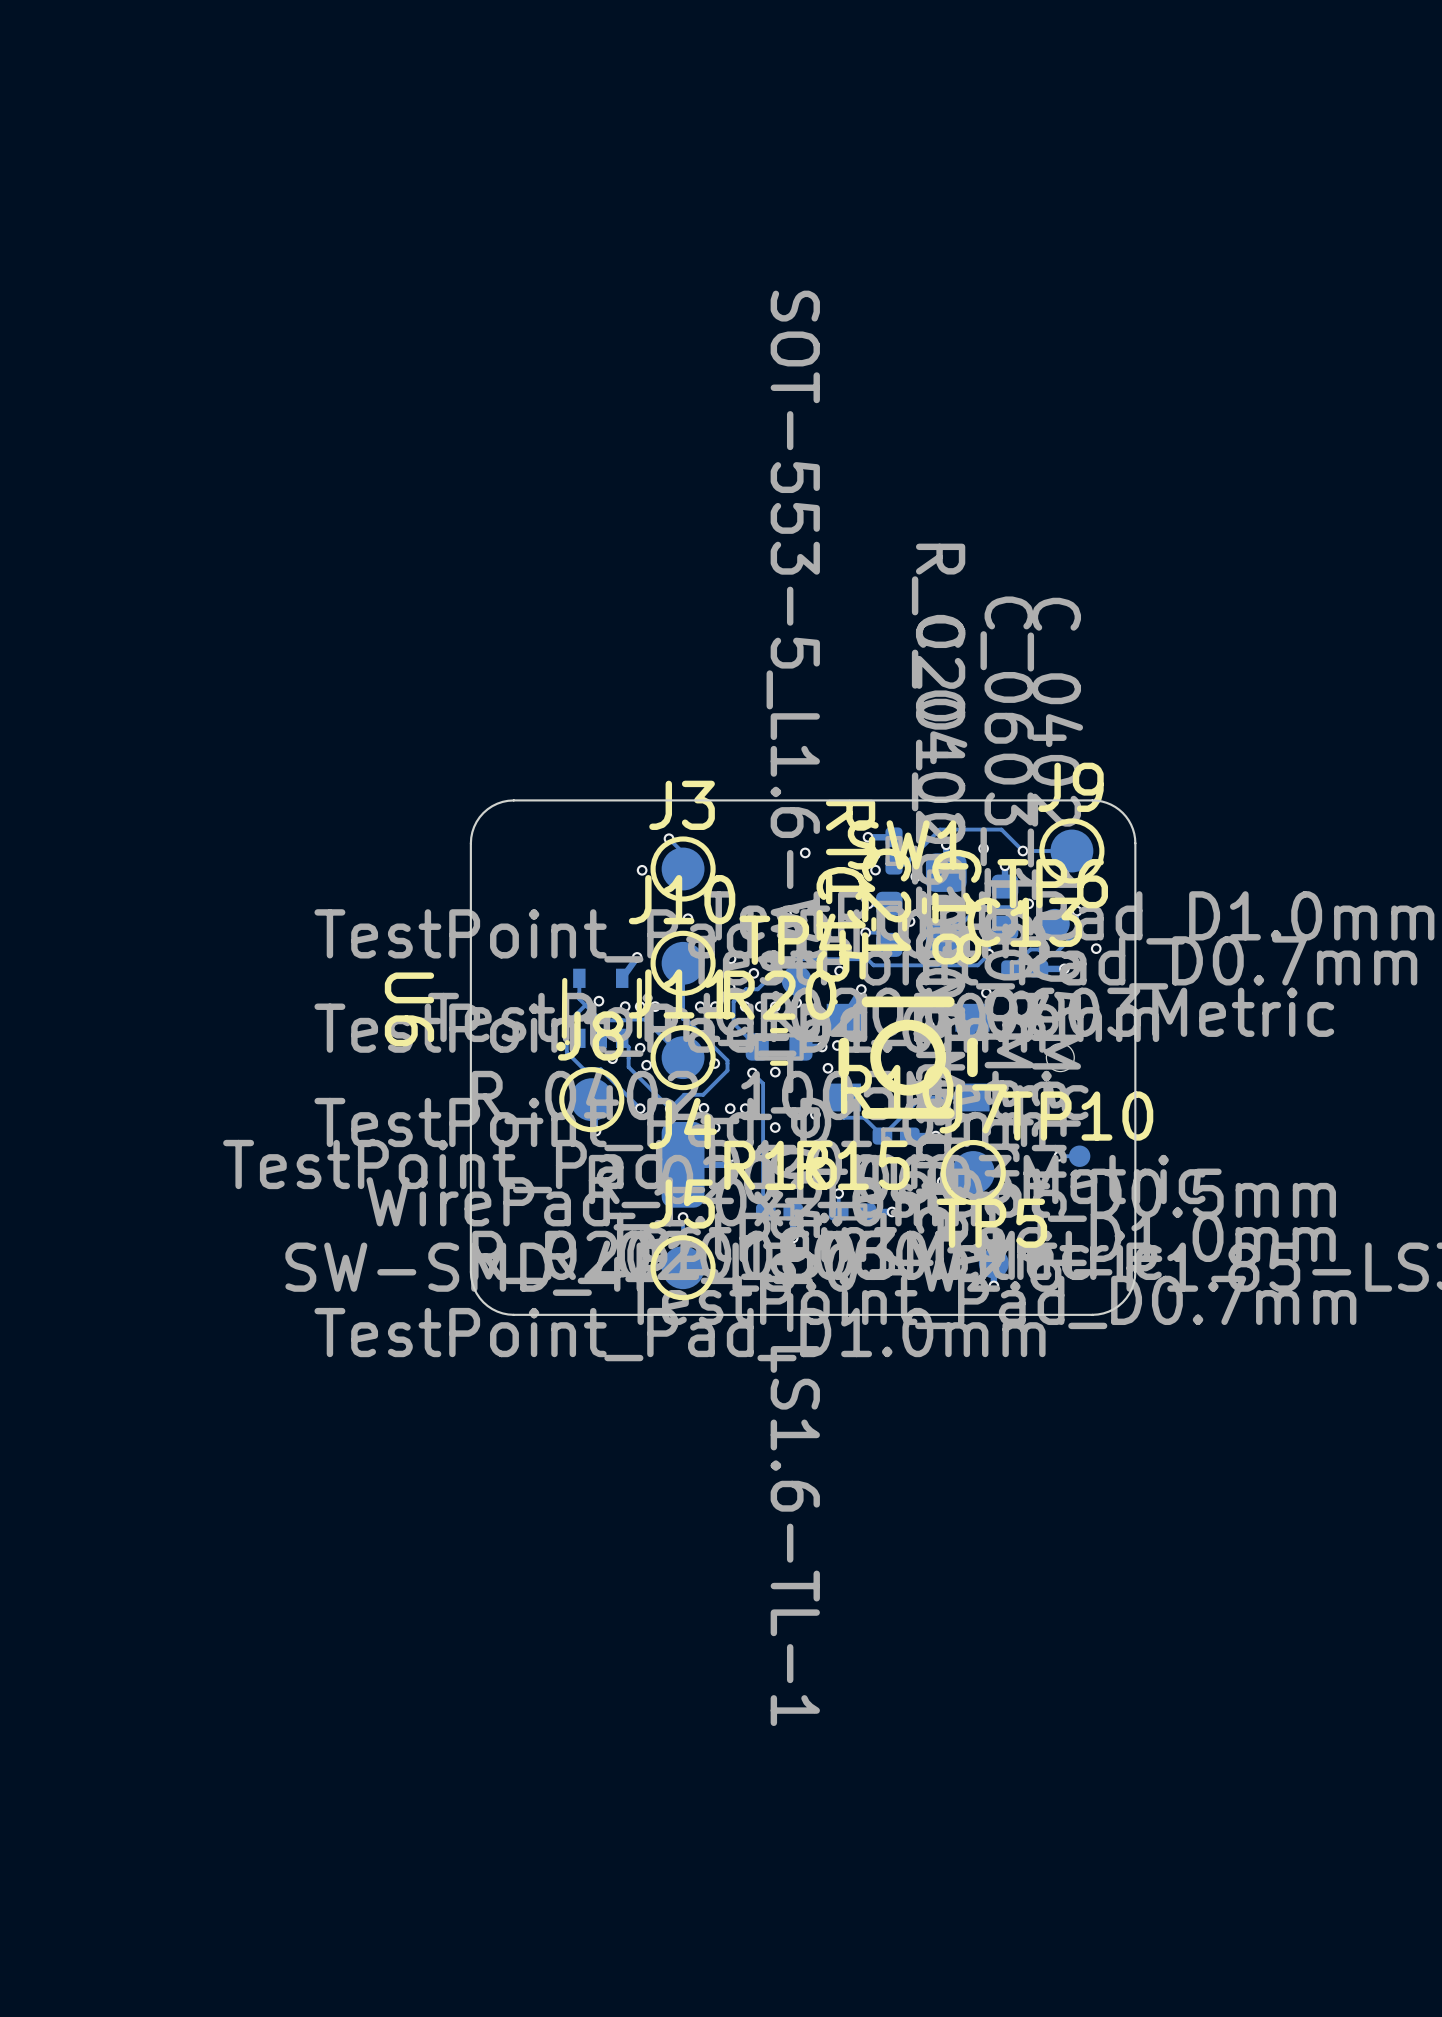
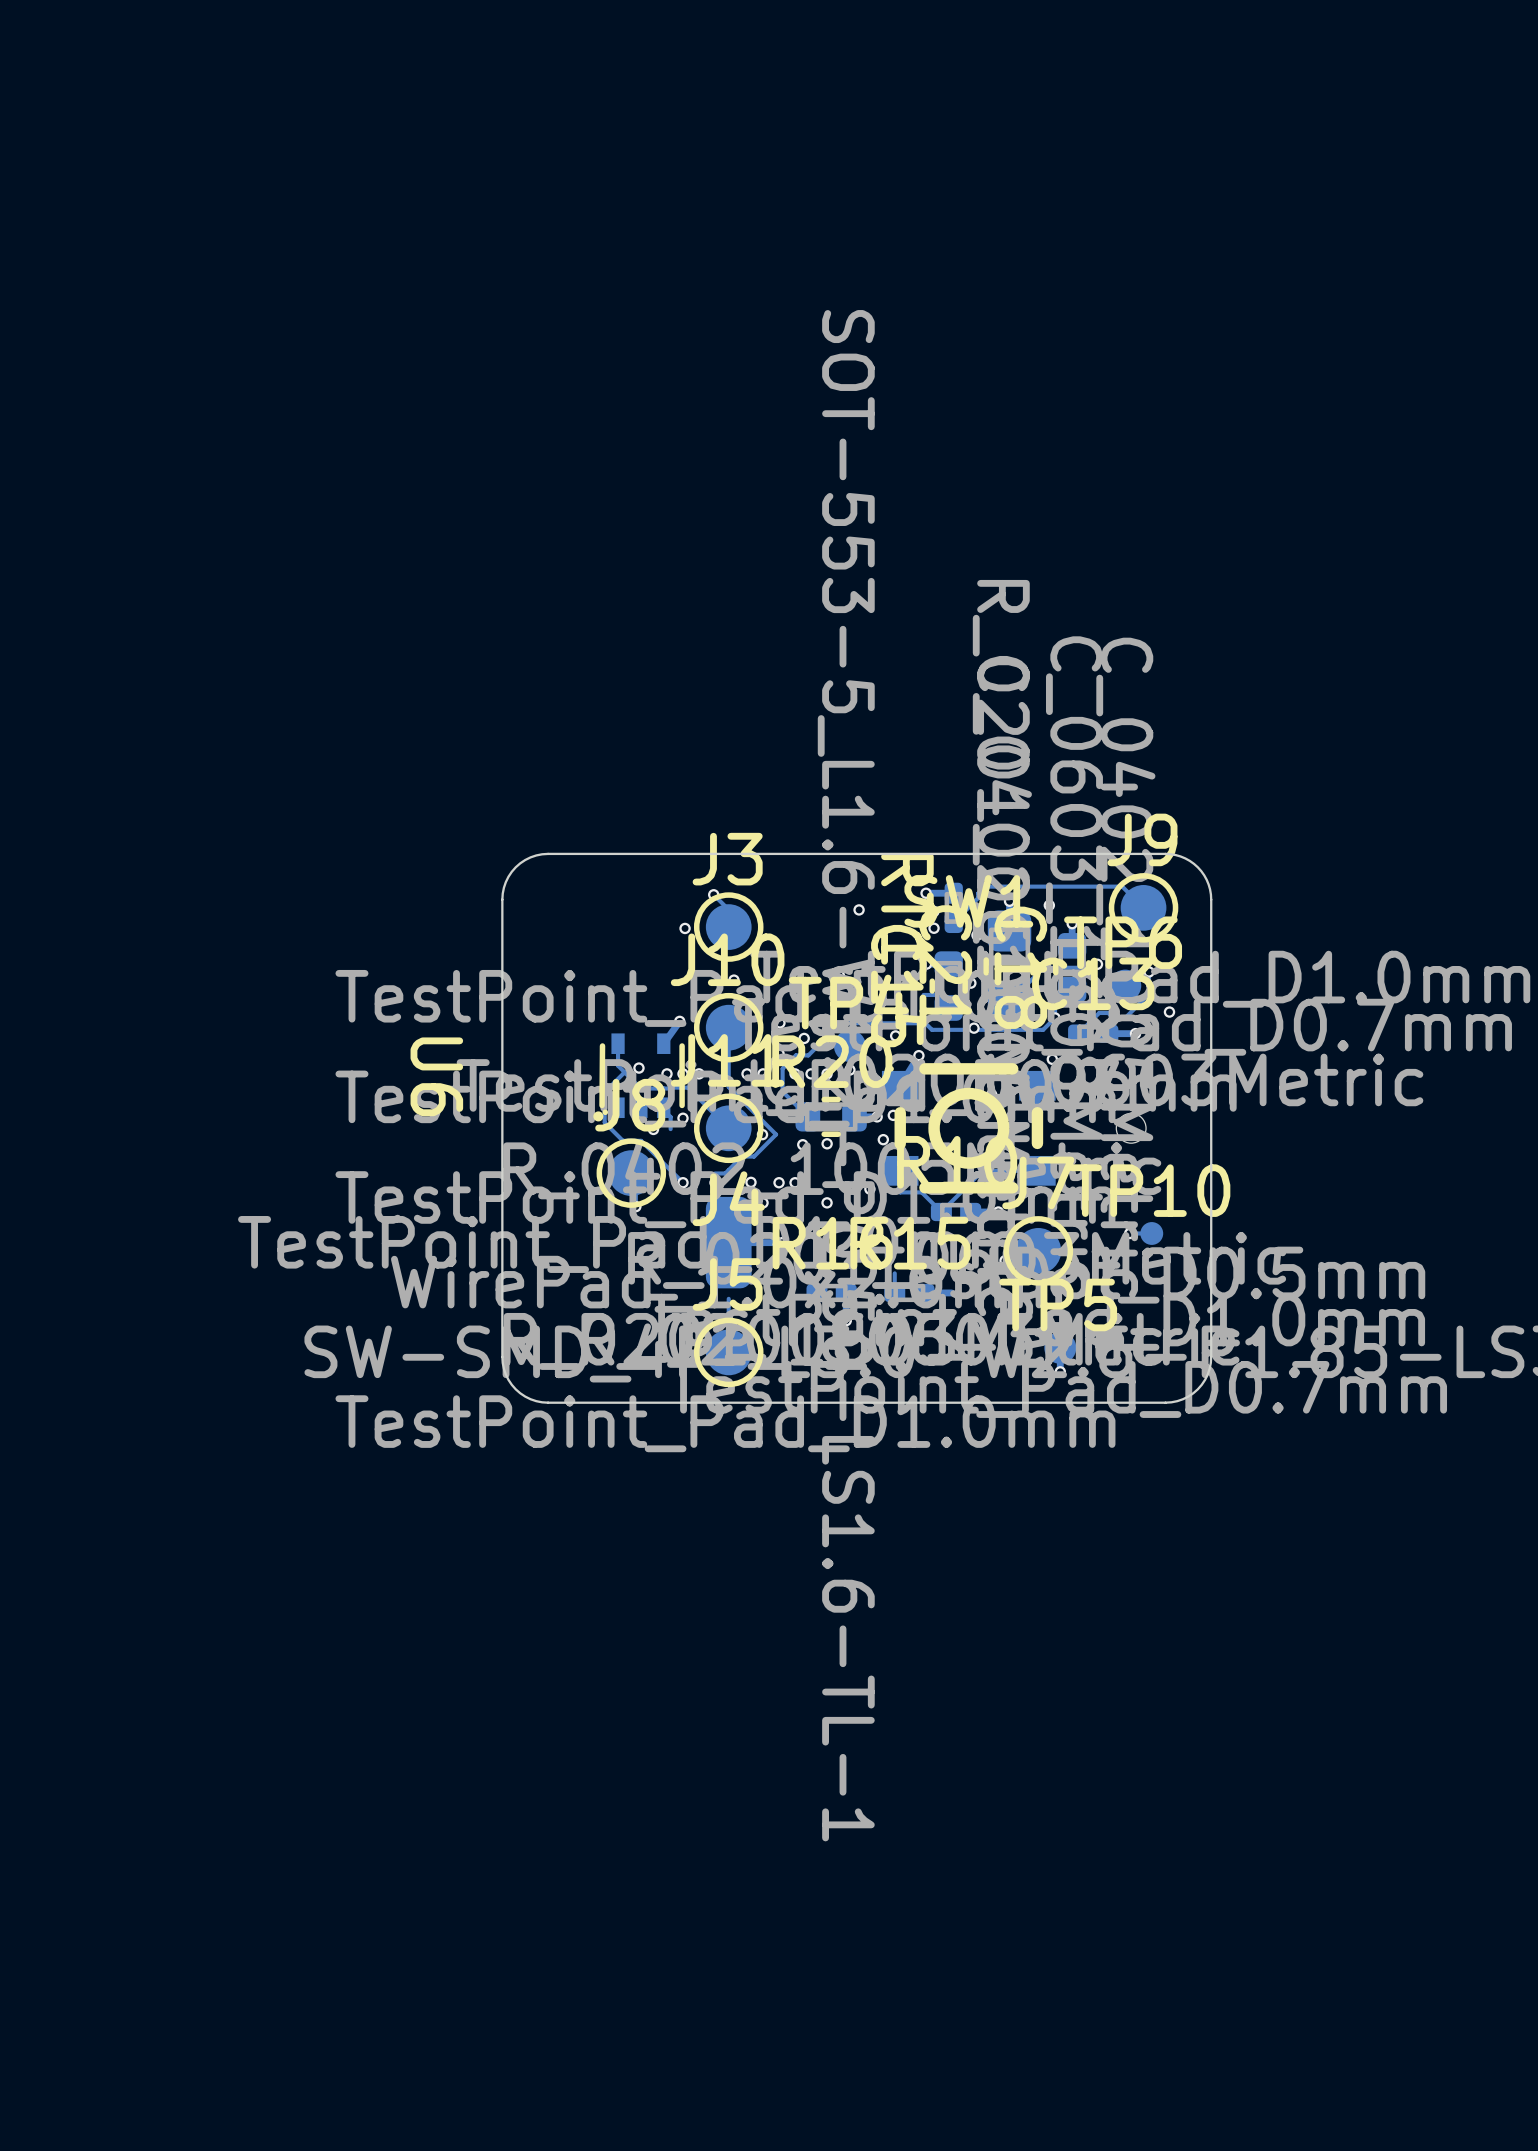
via: (1022, 851) -> none
track: (1071, 851) (1022, 851) (1001, 829) (939, 829) (908, 860) (908, 864) (894, 864) -> (1143, 907) (1122, 886) (985, 886) (978, 893) (978, 898) (953, 922)
via: (865, 932) -> none
via: none -> (974, 1028)
track: (683, 1019) (686, 1019) (727, 1060) (727, 1070) (703, 1094) (684, 1094) (670, 1108) (628, 1067) (628, 1058) -> (728, 1087) (776, 1134) (754, 1156) (742, 1156) (725, 1173) (715, 1173)
via: (646, 1065) -> none
track: (752, 1073) (763, 1083) (763, 1209) (765, 1211) -> none
via: (838, 1193) -> none
via: (892, 1211) -> none
via: (683, 1217) -> none

